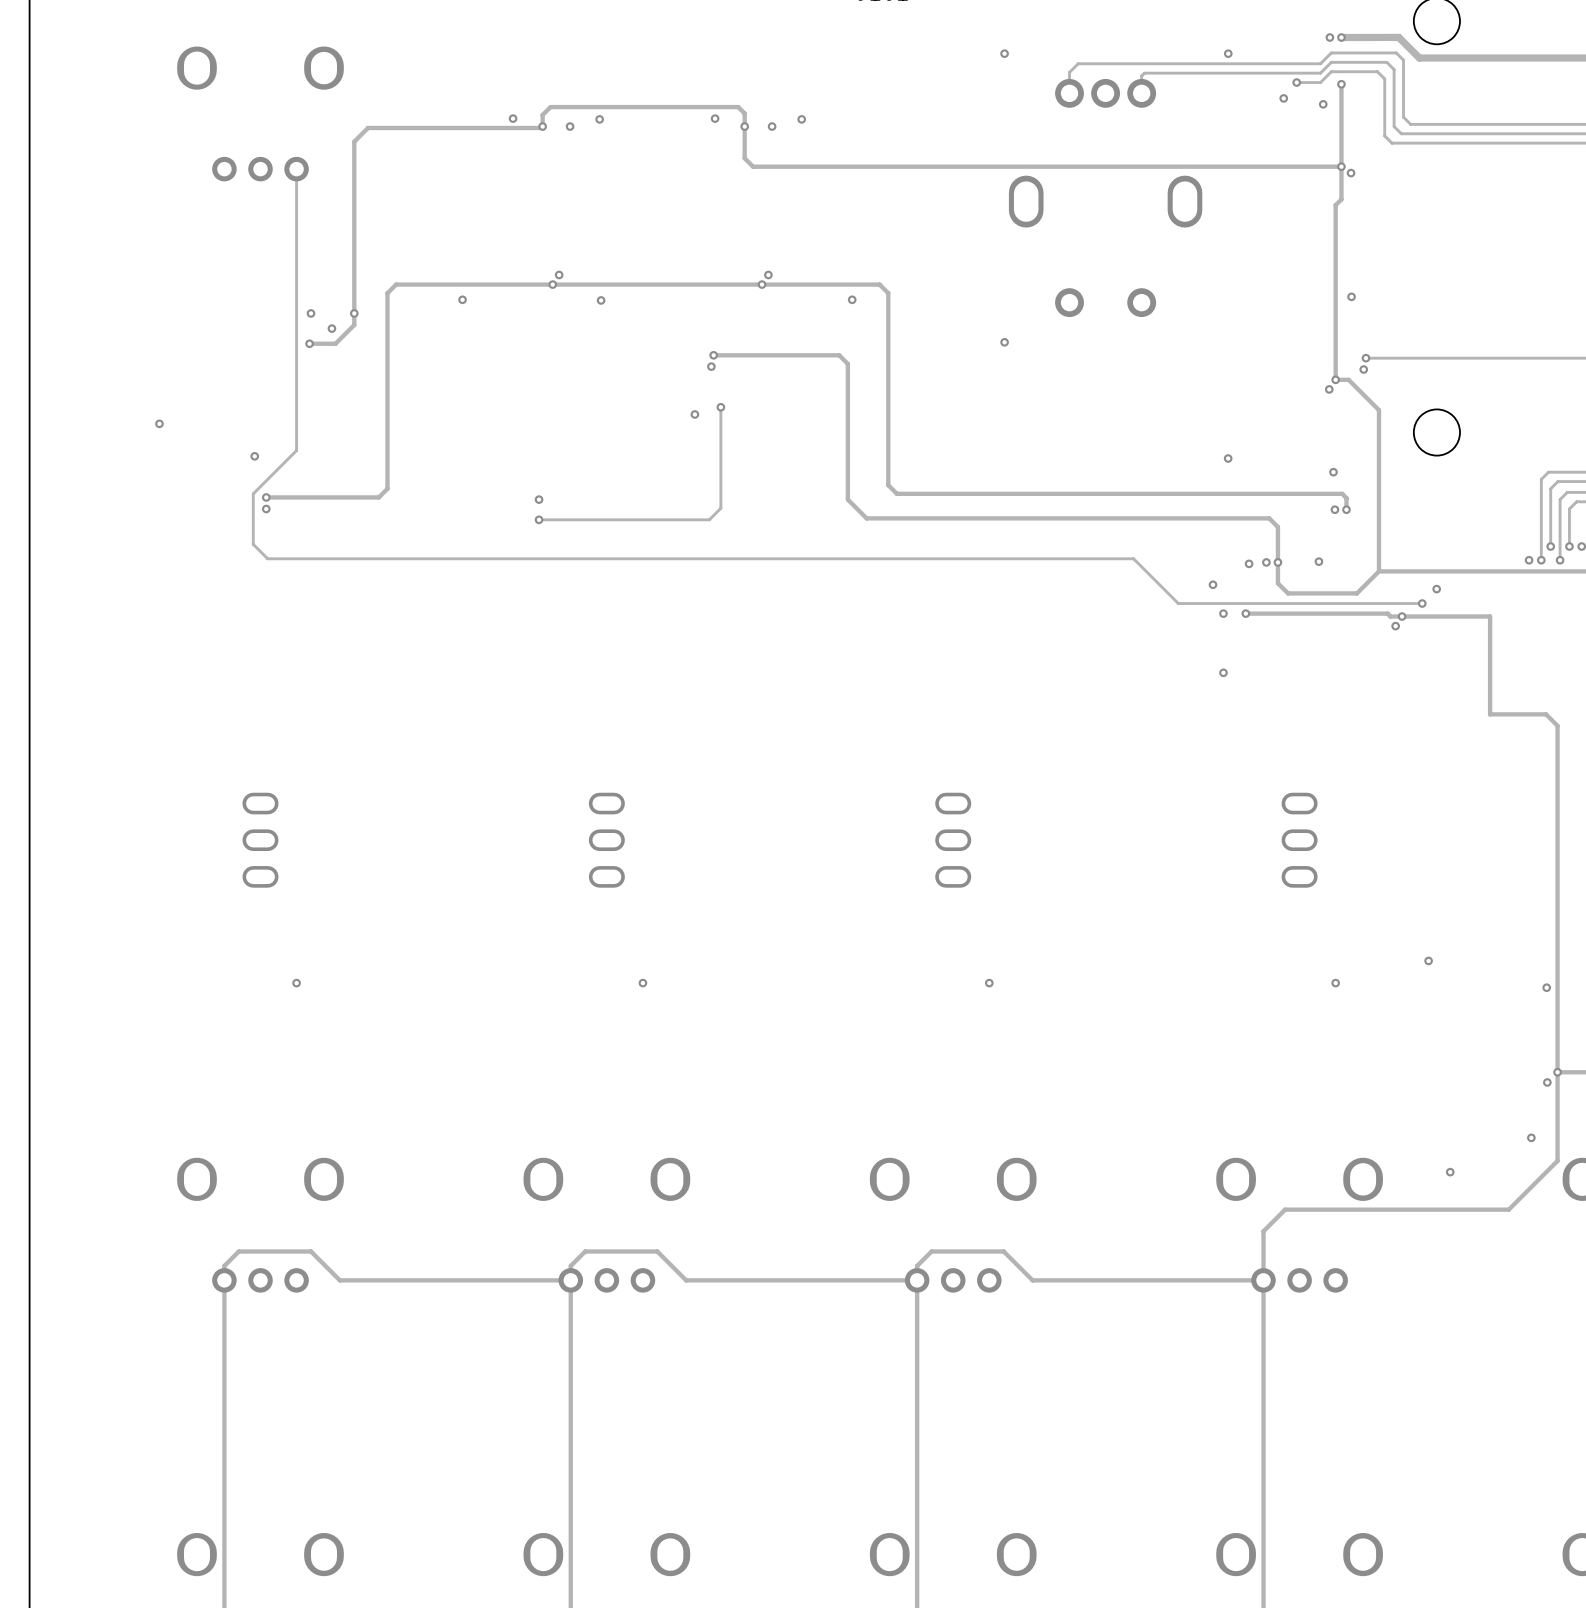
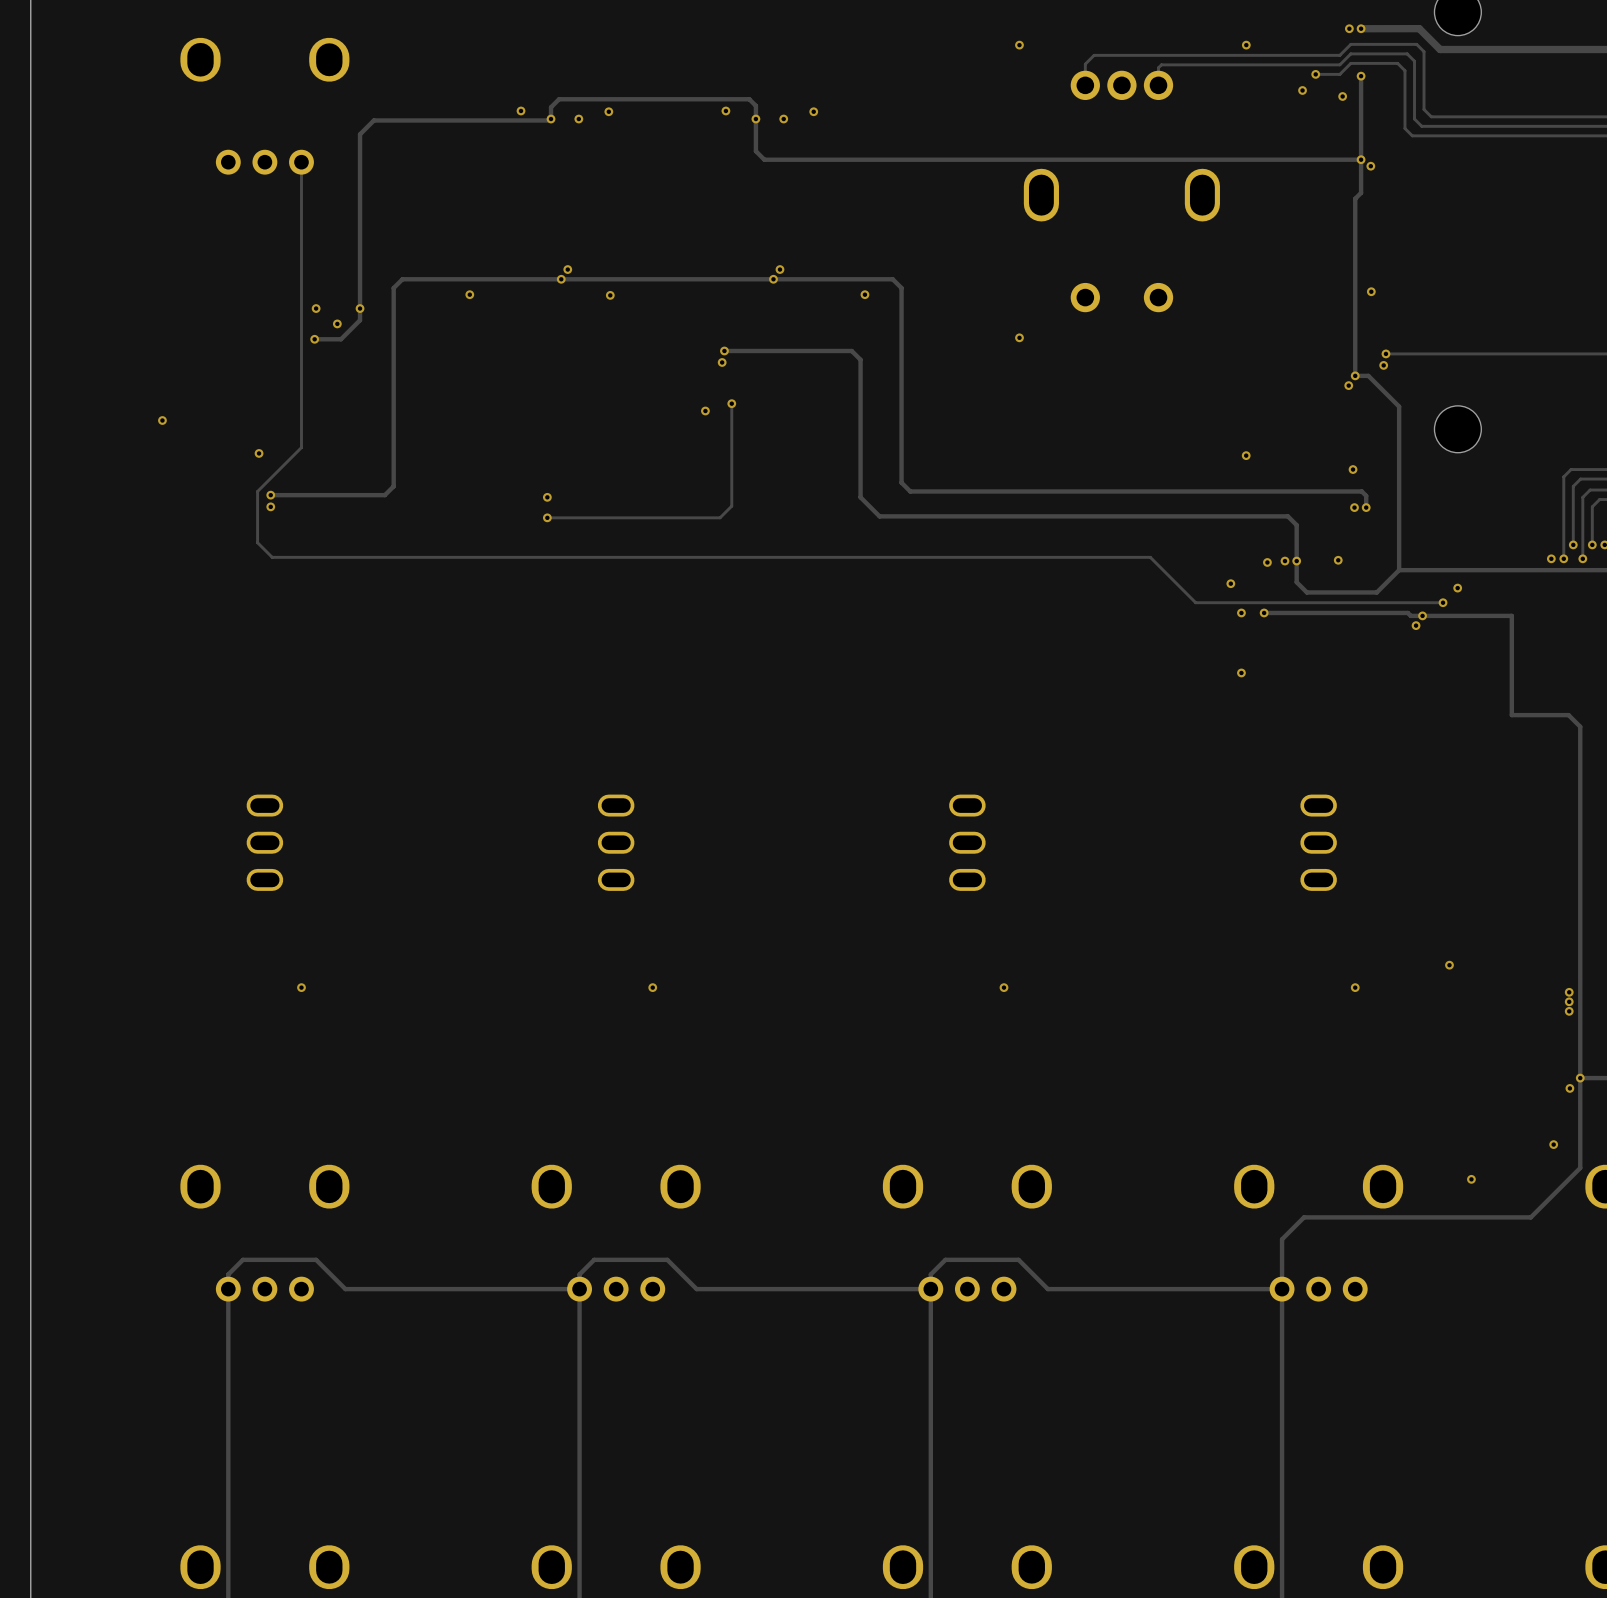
via: none -> (1569, 1001)
via: none -> (1569, 1011)

